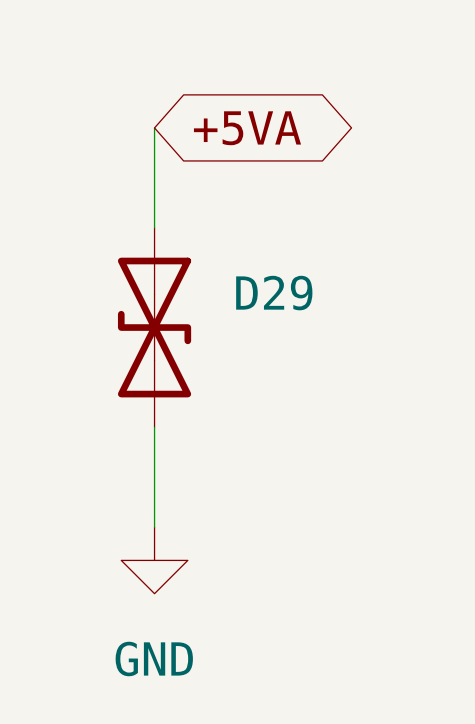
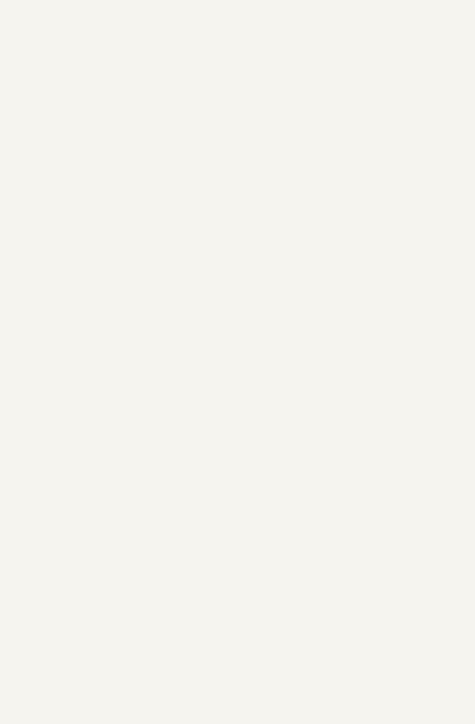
wire: (154, 127) (154, 227) -> none
global label: +5VA (247, 128) -> none
D29: (154, 327) -> none
wire: (154, 427) (154, 527) -> none
power symbol: GND (154, 560) -> none

